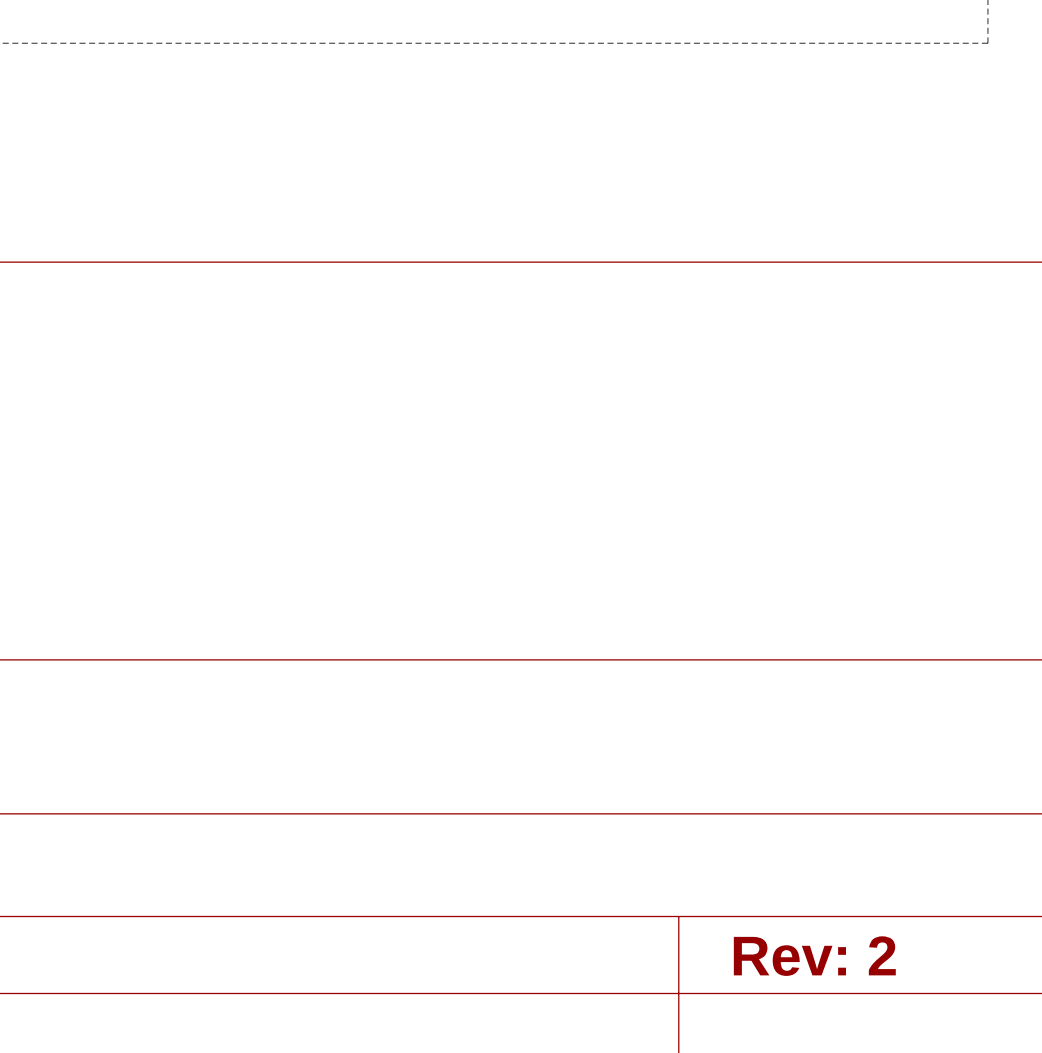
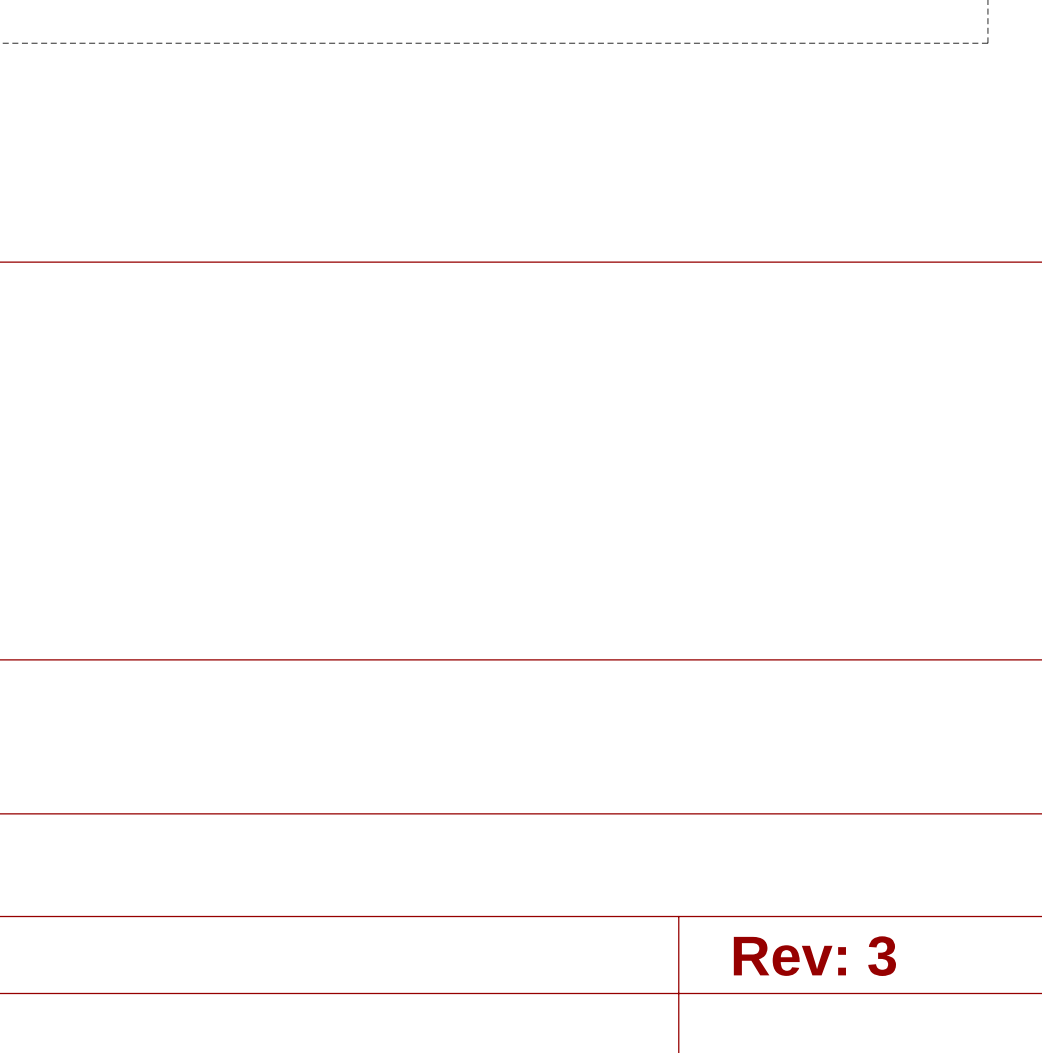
title block: Rev: 2 (814, 956) -> Rev: 3 (814, 956)

